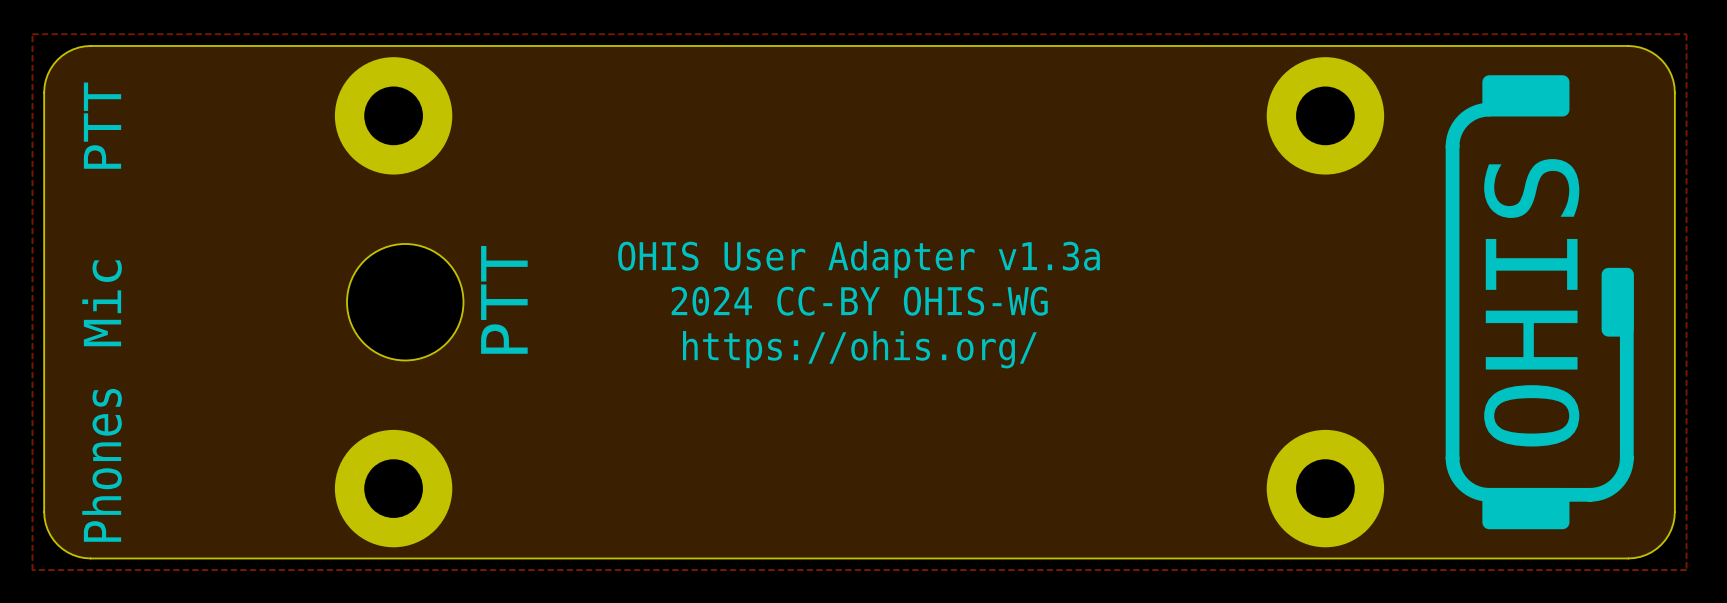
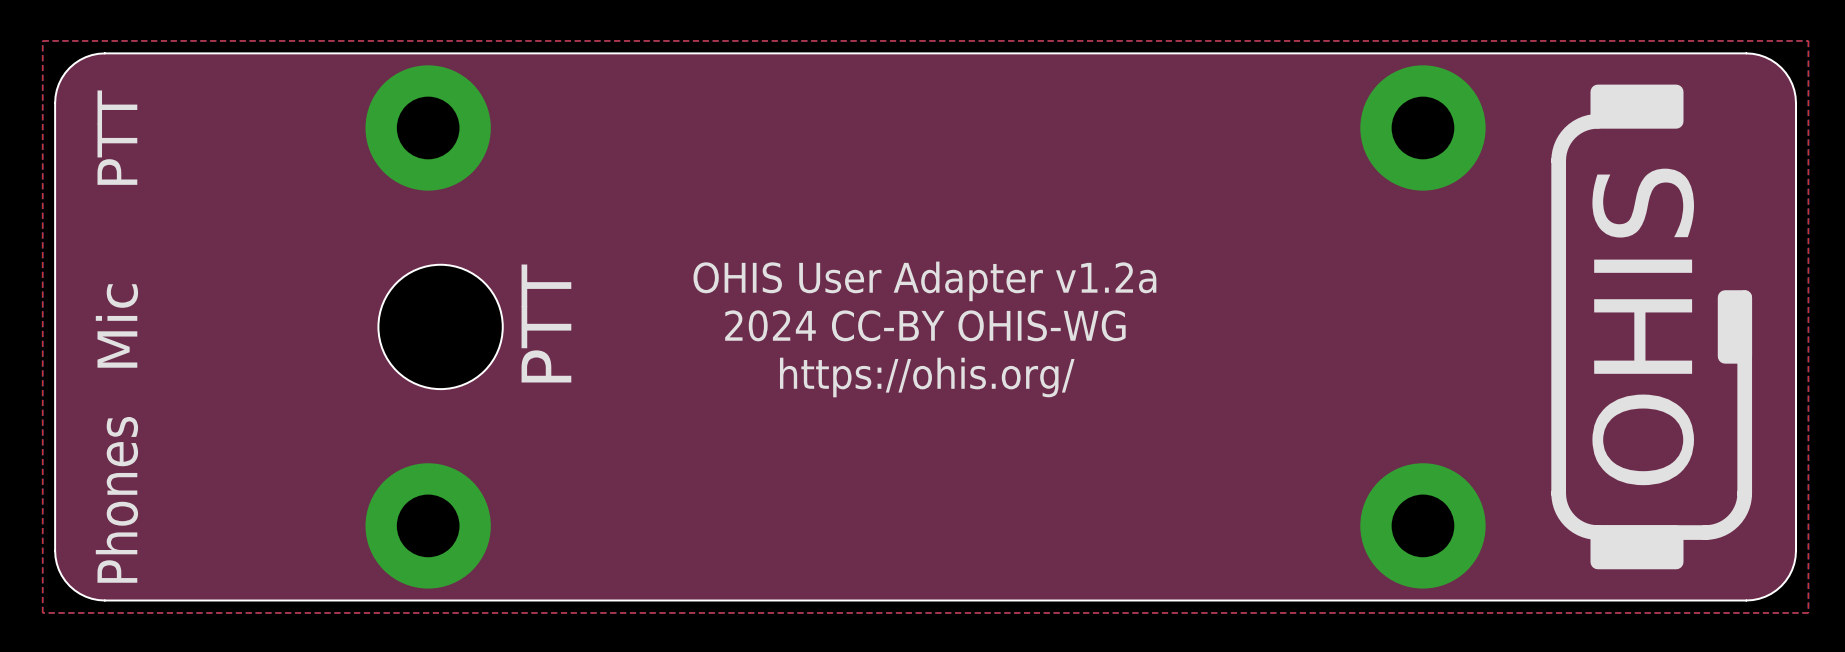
text: OHIS User Adapter v1.3a (859, 259) -> OHIS User Adapter v1.2a (924, 281)

